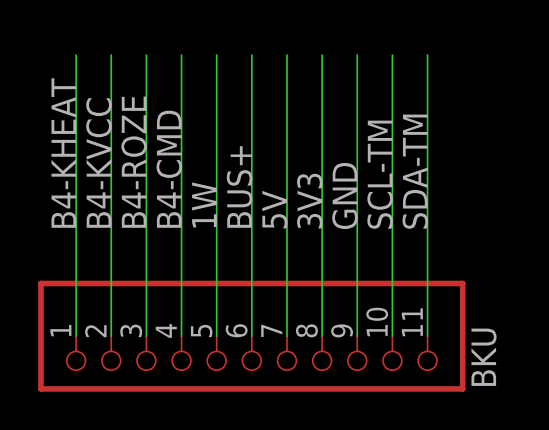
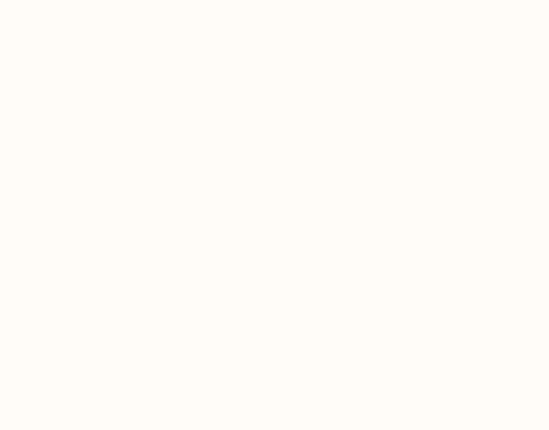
wire: (76, 55) (76, 336) -> none
wire: (111, 55) (111, 336) -> none
wire: (146, 55) (146, 336) -> none
wire: (181, 55) (181, 336) -> none
wire: (216, 55) (216, 336) -> none
wire: (251, 55) (251, 336) -> none
wire: (286, 55) (286, 336) -> none
wire: (322, 55) (322, 336) -> none
wire: (357, 55) (357, 336) -> none
wire: (392, 55) (392, 336) -> none
wire: (427, 55) (427, 336) -> none
label: B4-KHEAT (63, 153) -> none
label: B4-ROZE (134, 162) -> none
label: B4-KVCC (98, 163) -> none
label: B4-CMD (169, 169) -> none
label: SDA-TM (415, 171) -> none
label: SCL-TM (380, 174) -> none
label: BUS+ (239, 187) -> none
label: GND (344, 196) -> none
label: 3V3 (309, 201) -> none
label: 1W (204, 204) -> none
label: 5V (274, 209) -> none
BKU: (251, 336) -> none

